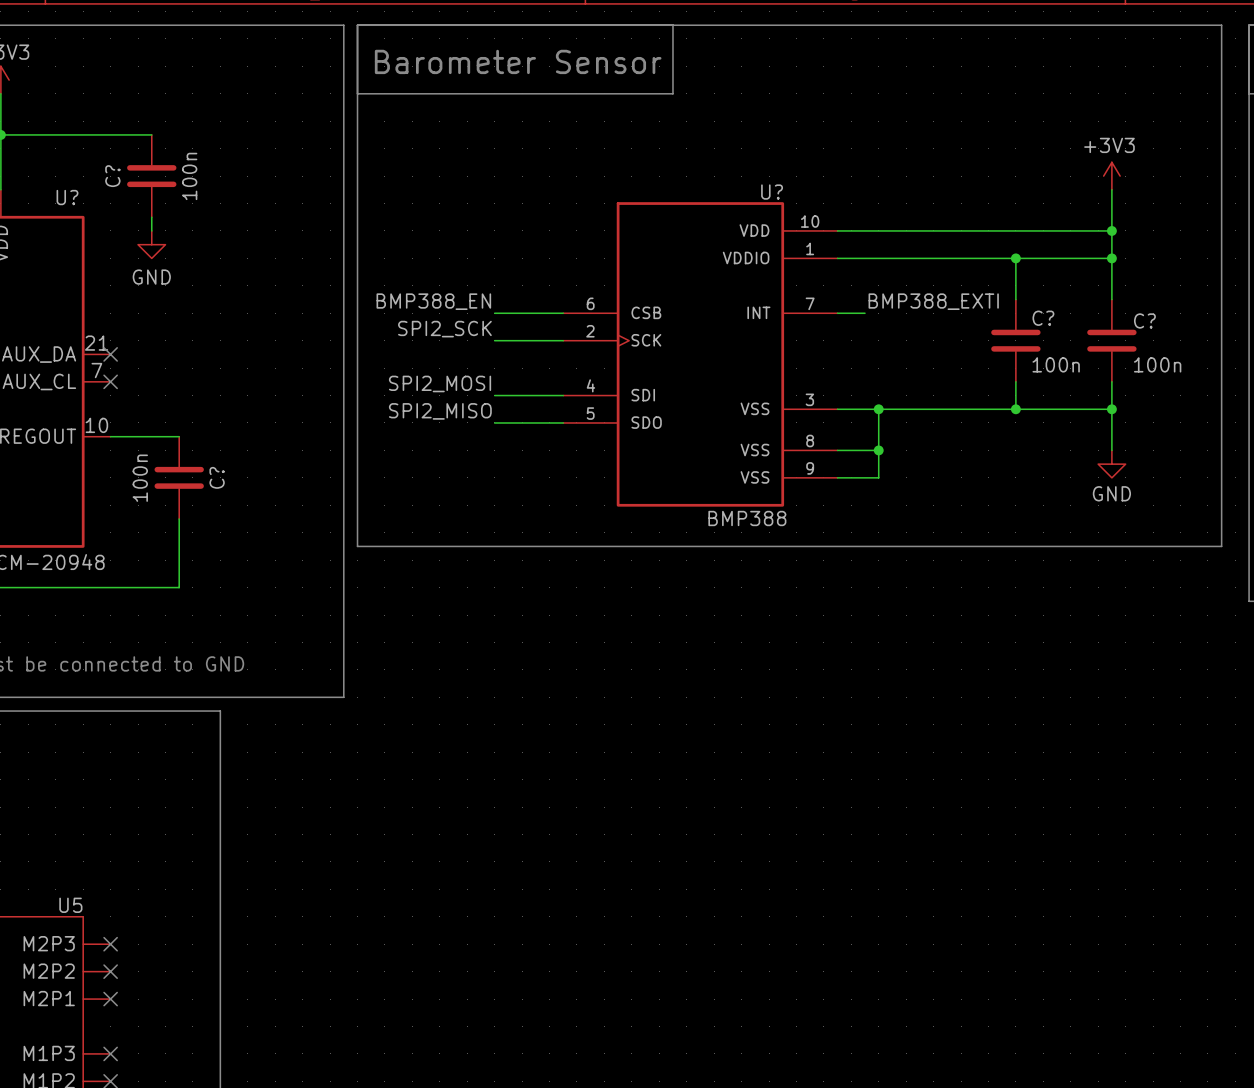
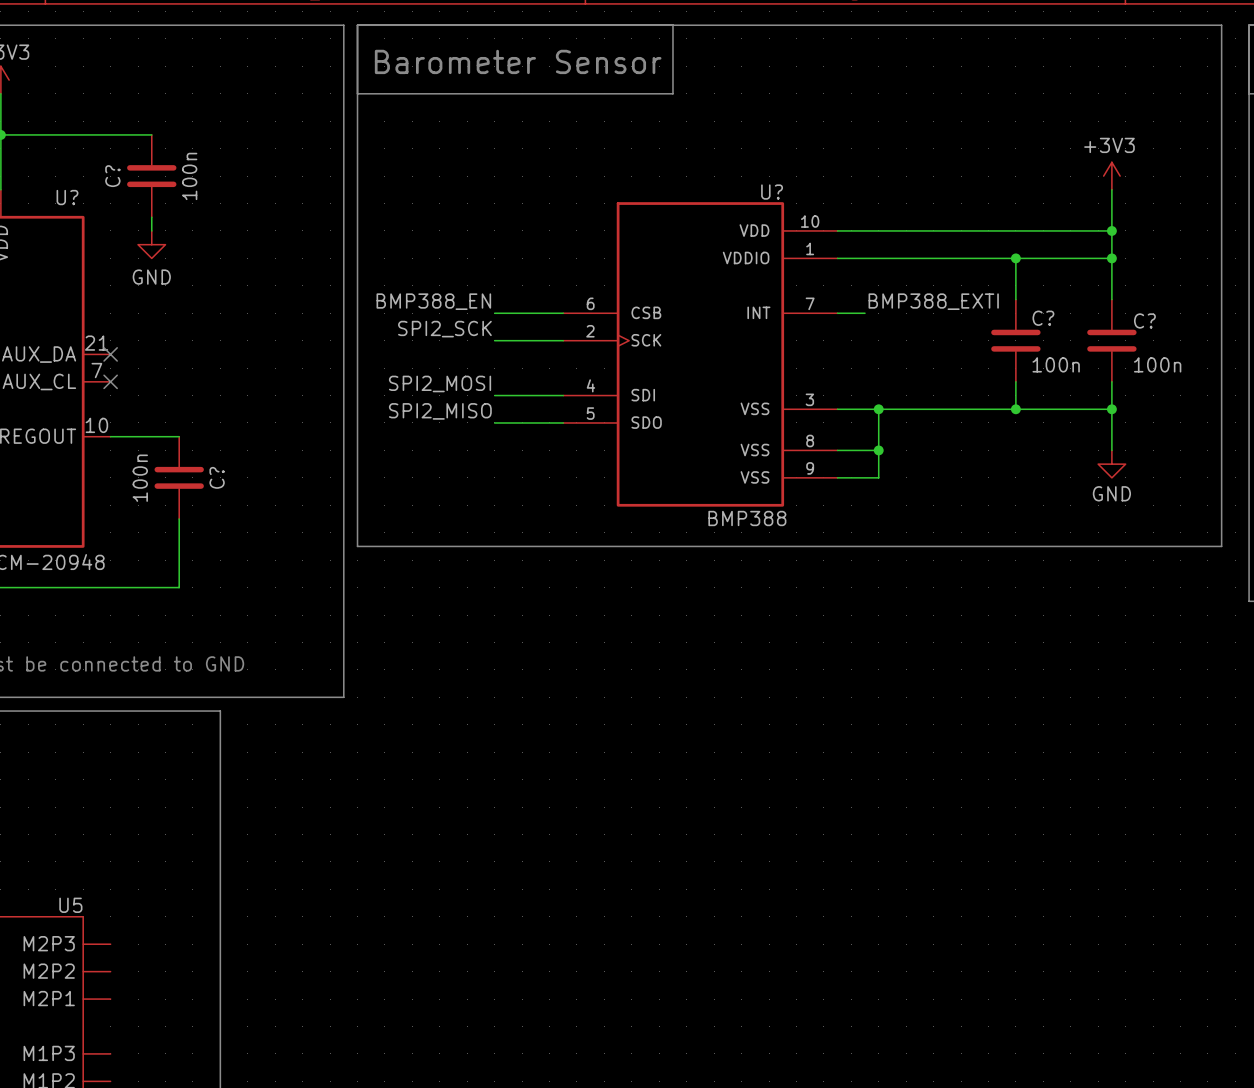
no-connect mark: (110, 944) -> none
no-connect mark: (110, 971) -> none
no-connect mark: (110, 999) -> none
no-connect mark: (110, 1053) -> none
no-connect mark: (110, 1081) -> none

